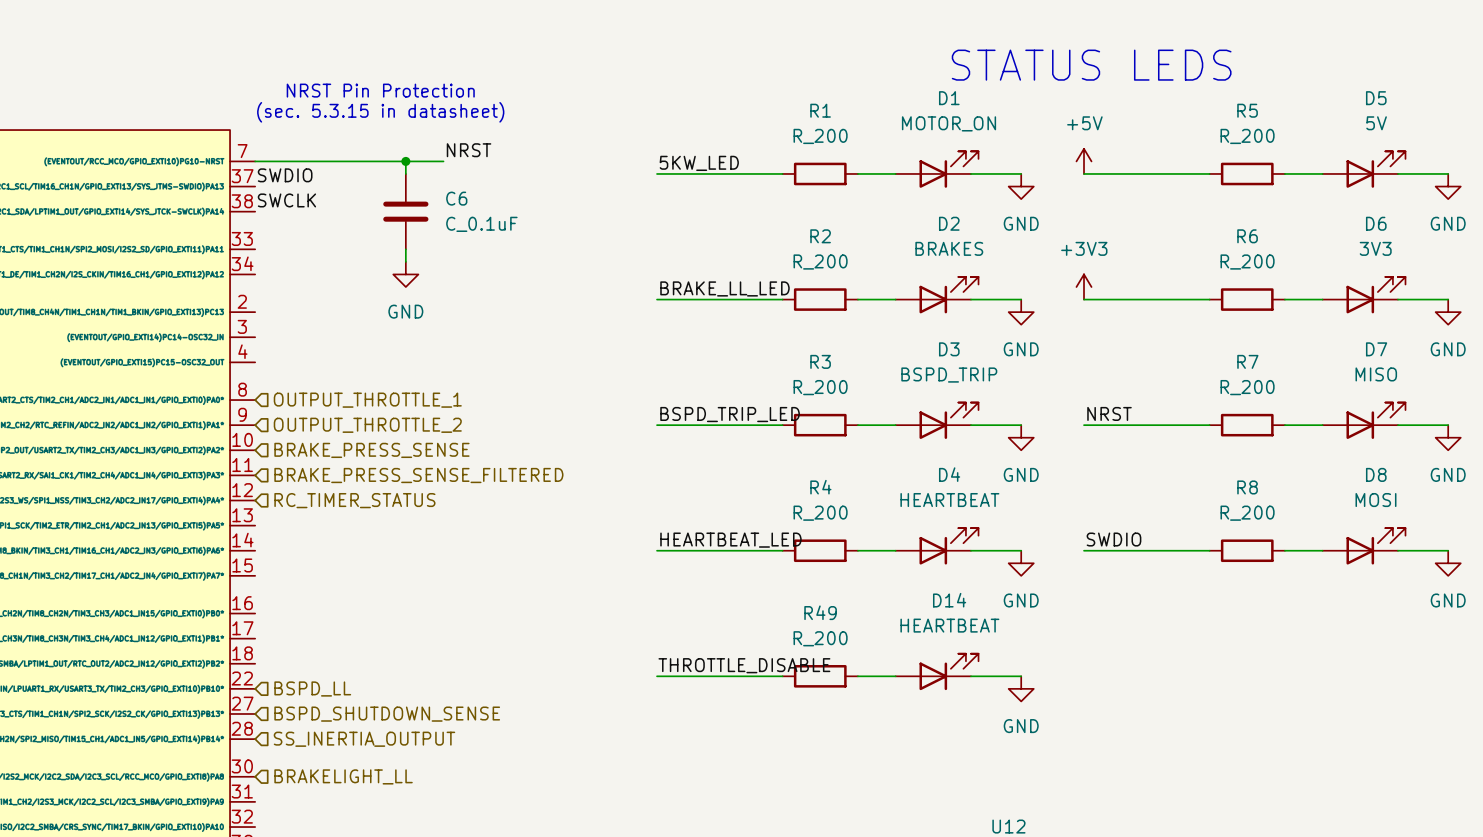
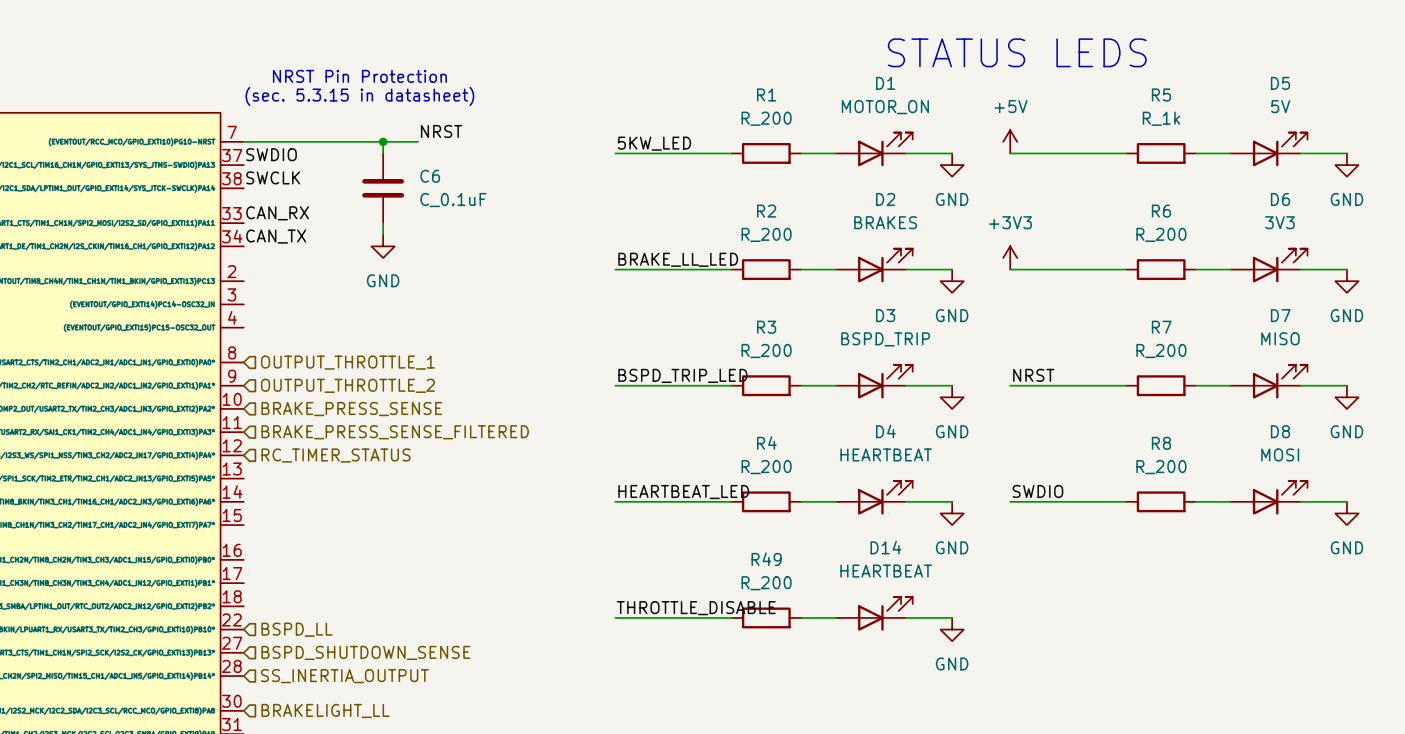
R5 value: R_200 (1247, 136) -> R_1k (1161, 118)
label: none -> CAN_RX (277, 213)
label: none -> CAN_TX (276, 236)

